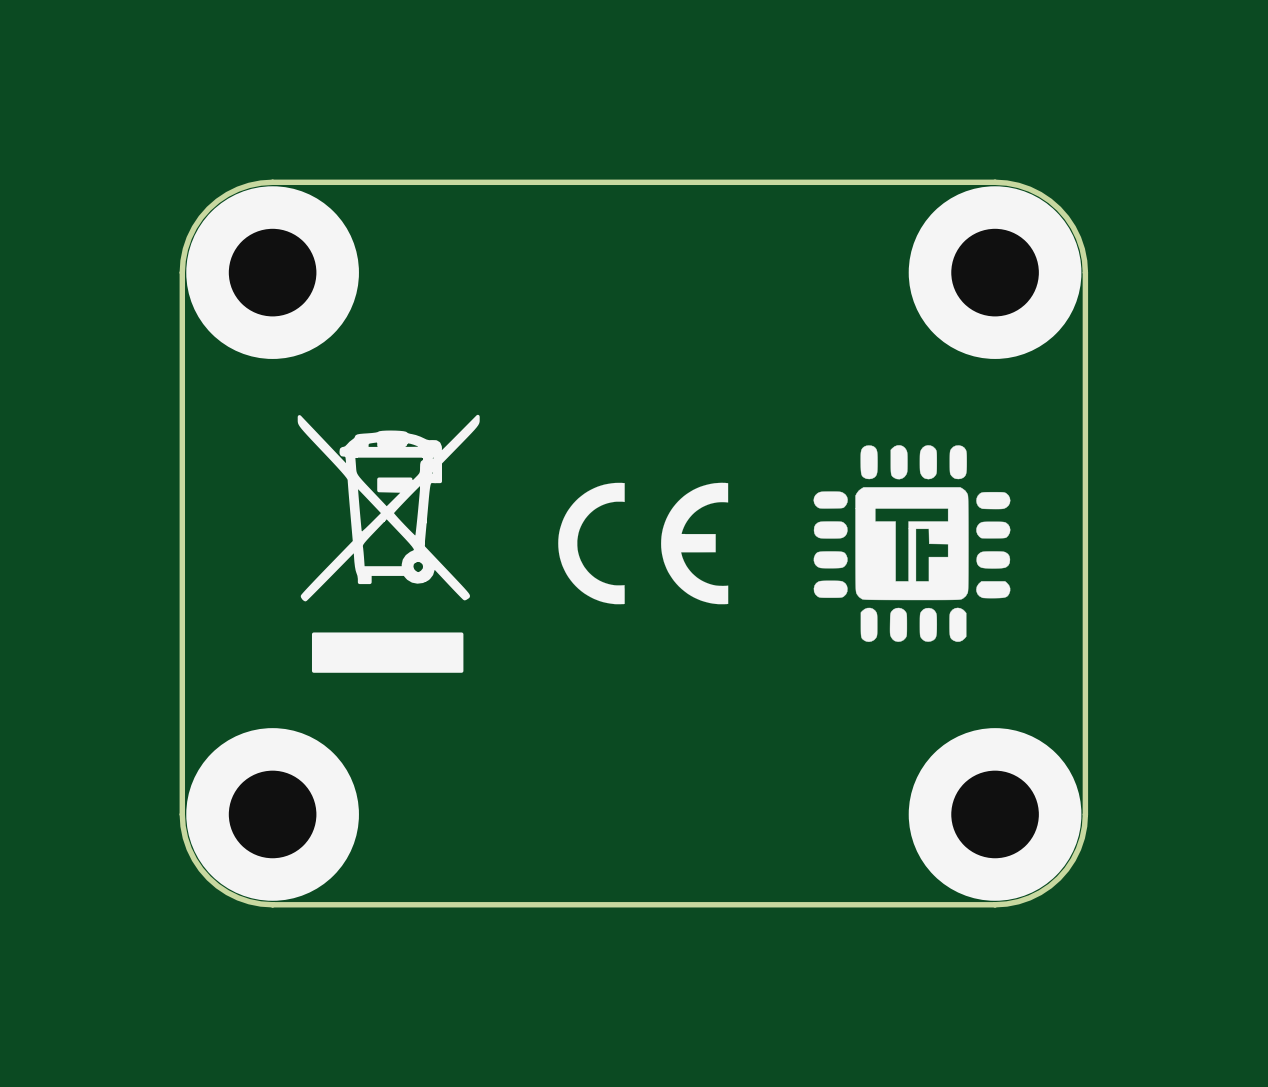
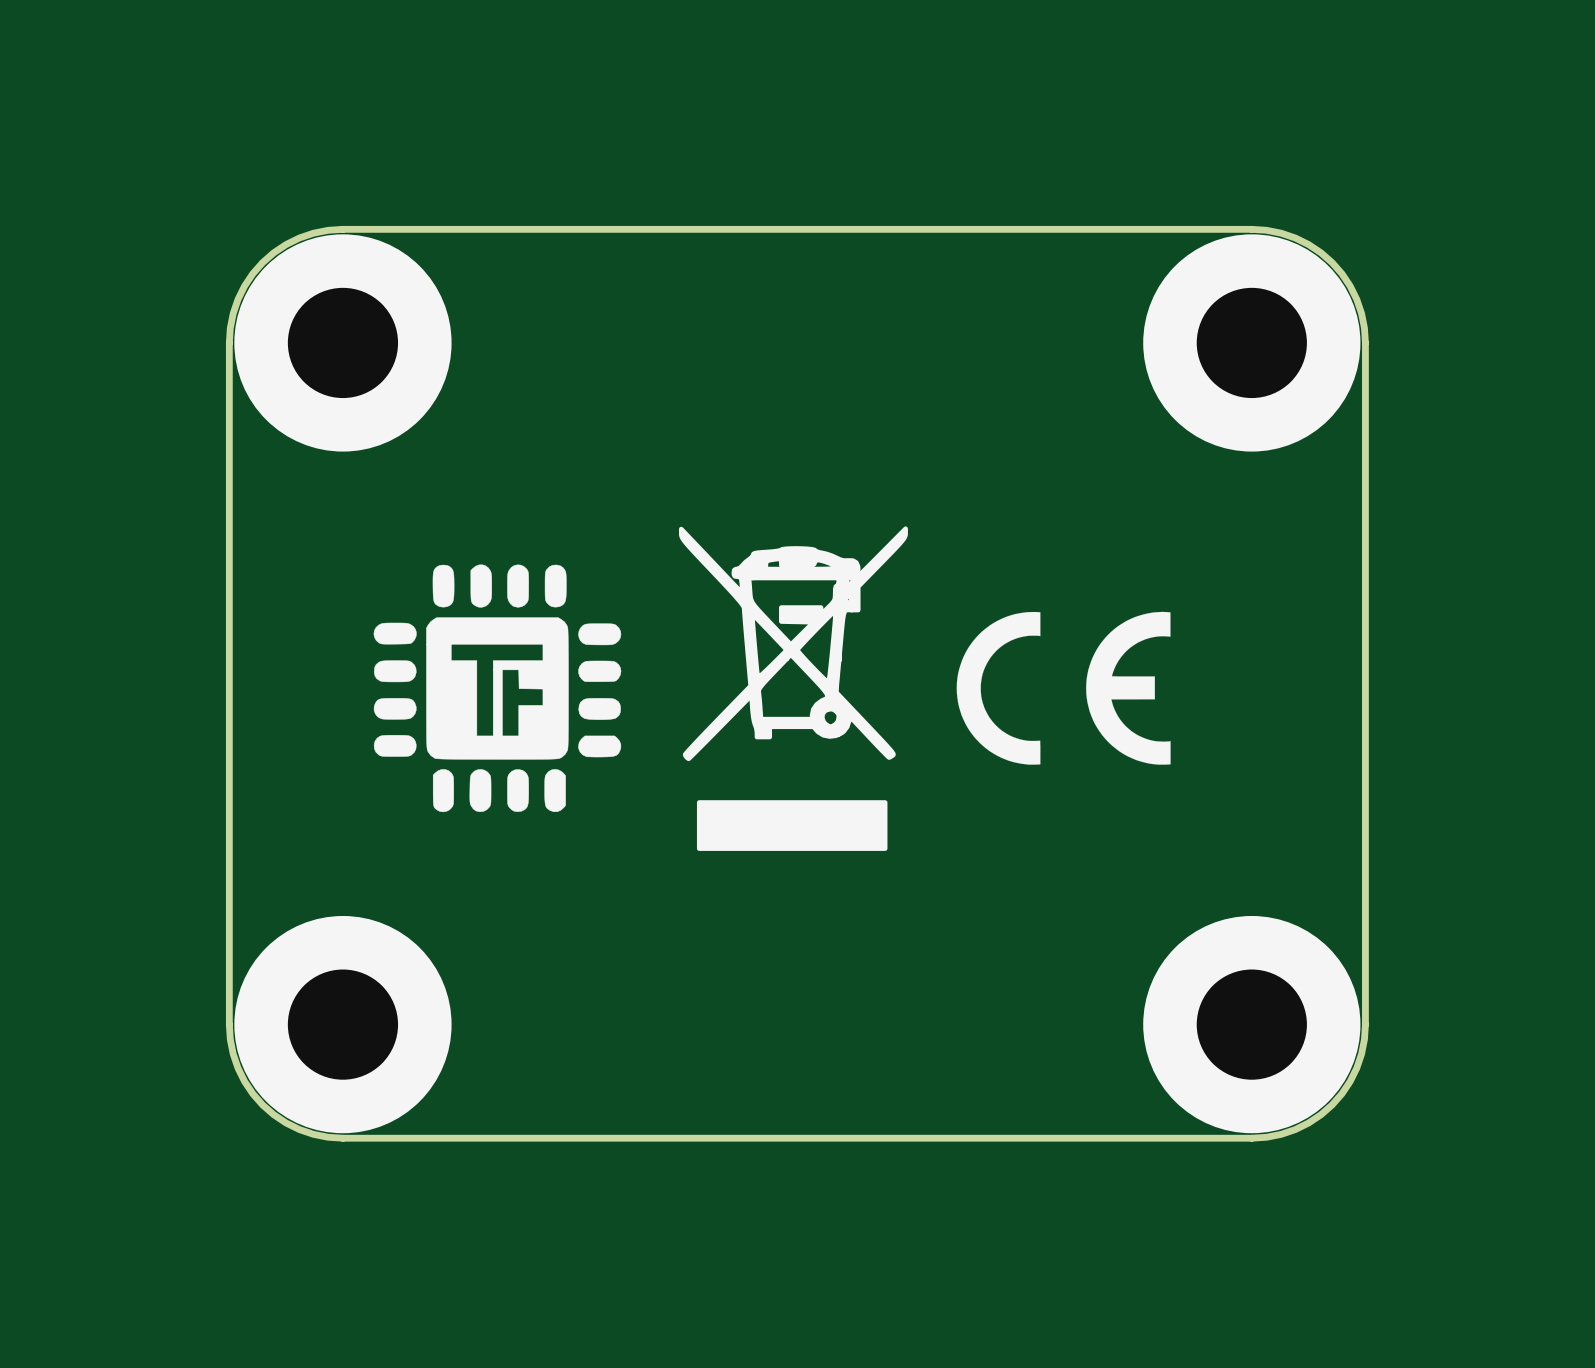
drawing position: (388, 543) -> (793, 688)
drawing position: (643, 543) -> (1063, 688)
drawing position: (911, 543) -> (497, 688)

